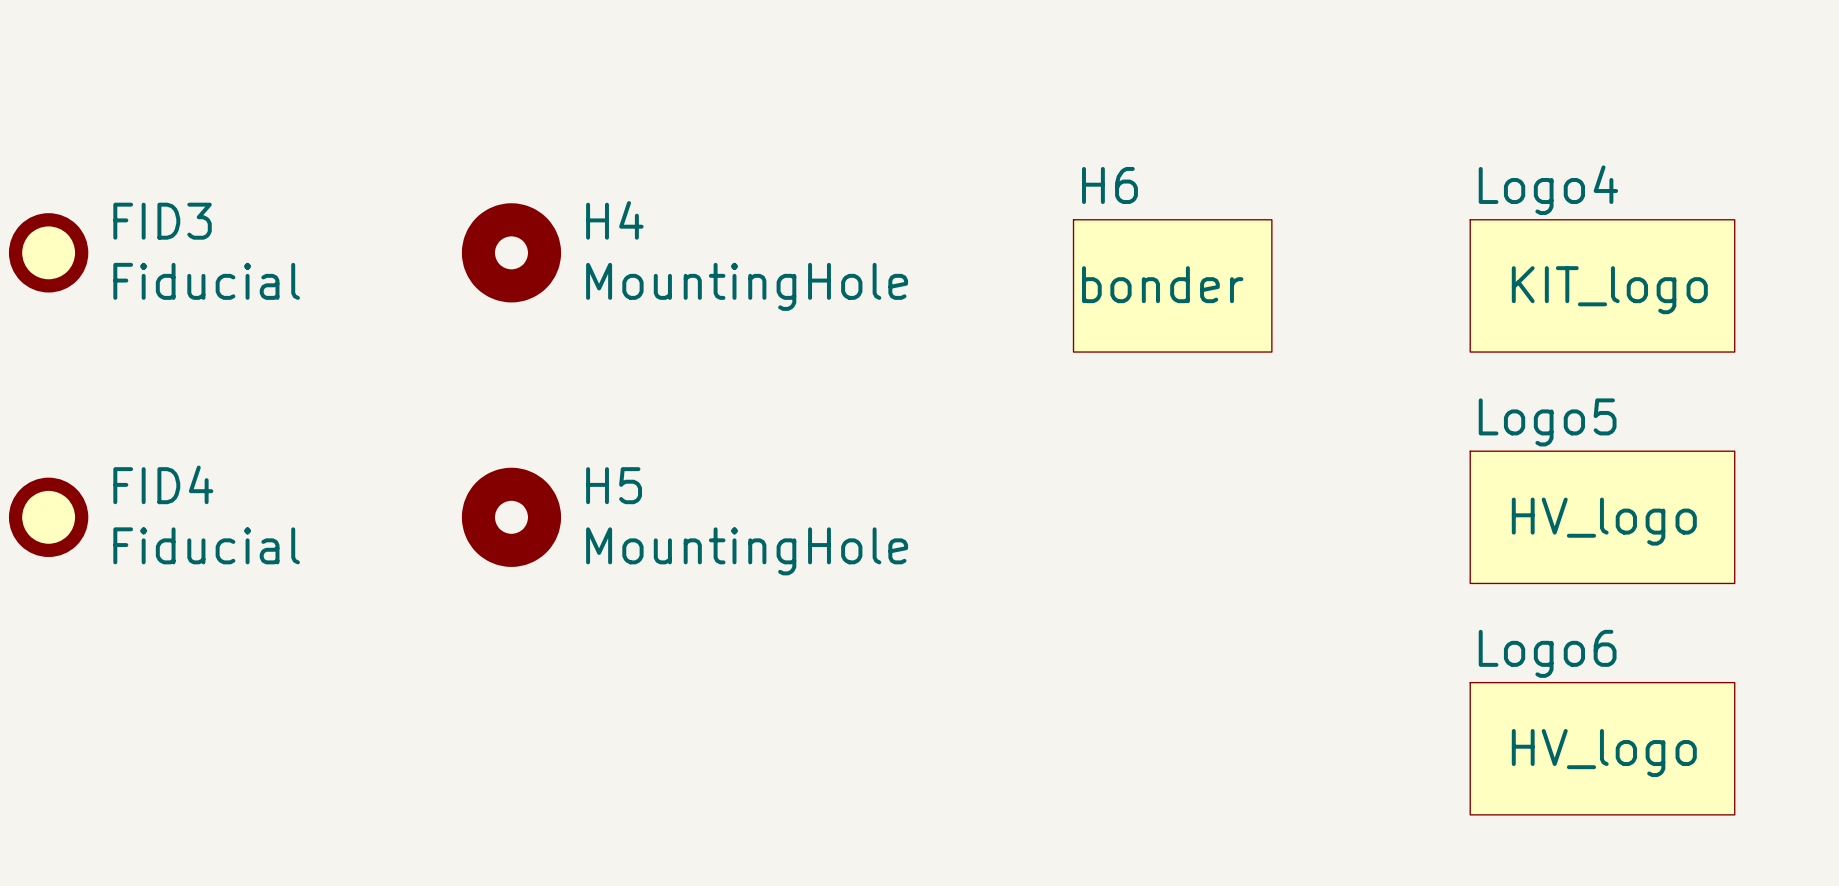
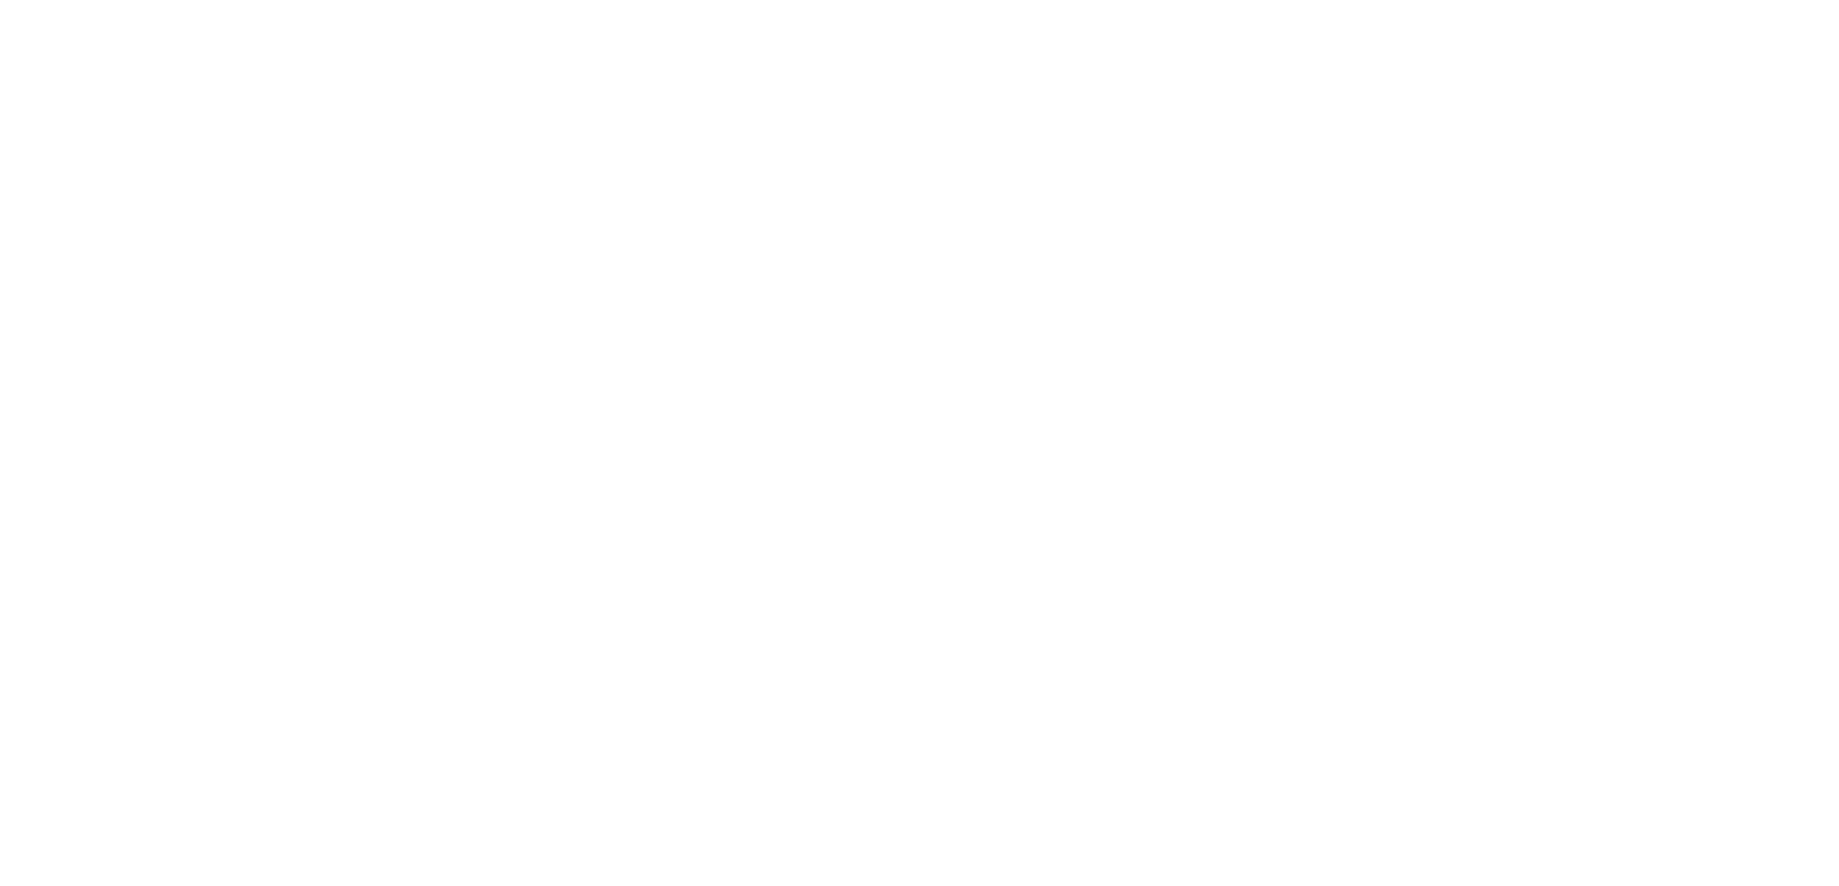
FID3: Fiducial (48, 252) -> none
H4: MountingHole (511, 252) -> none
H6: bonder (1172, 285) -> none
Logo4: KIT_logo (1602, 285) -> none
FID4: Fiducial (48, 517) -> none
H5: MountingHole (511, 517) -> none
Logo5: HV_logo (1602, 517) -> none
Logo6: HV_logo (1602, 748) -> none

